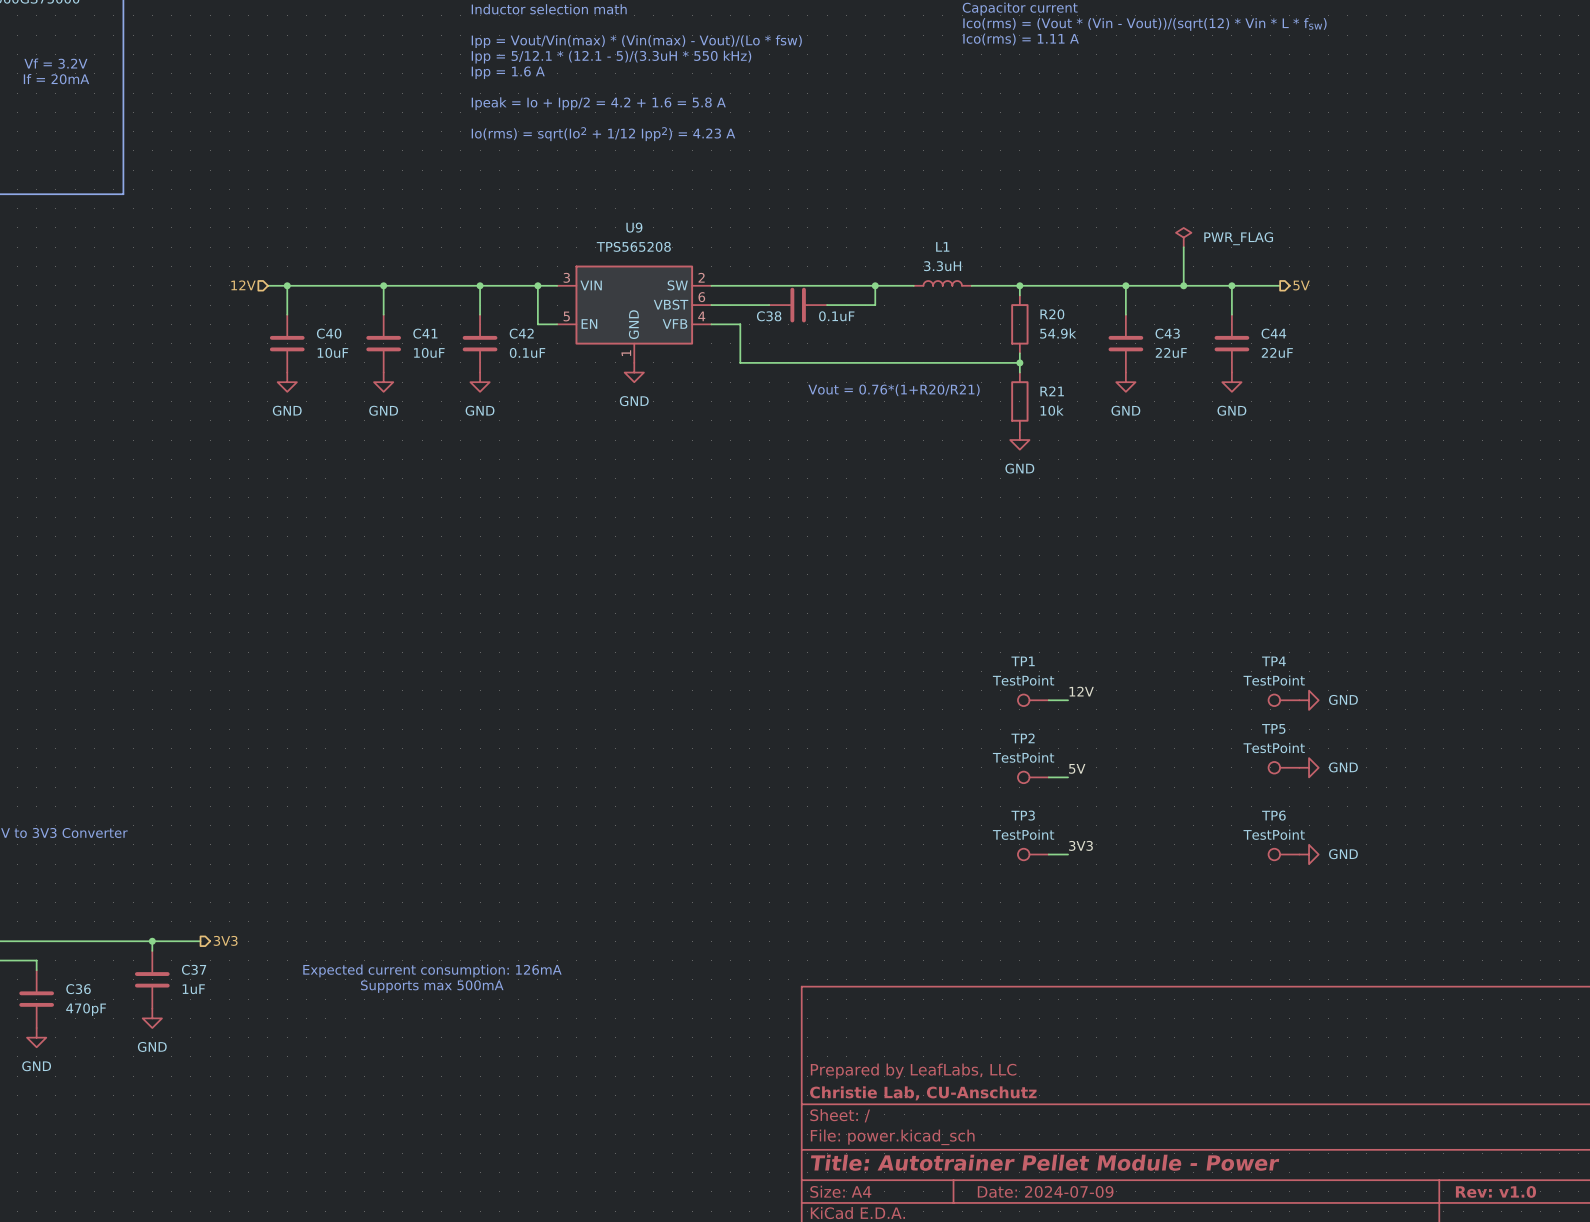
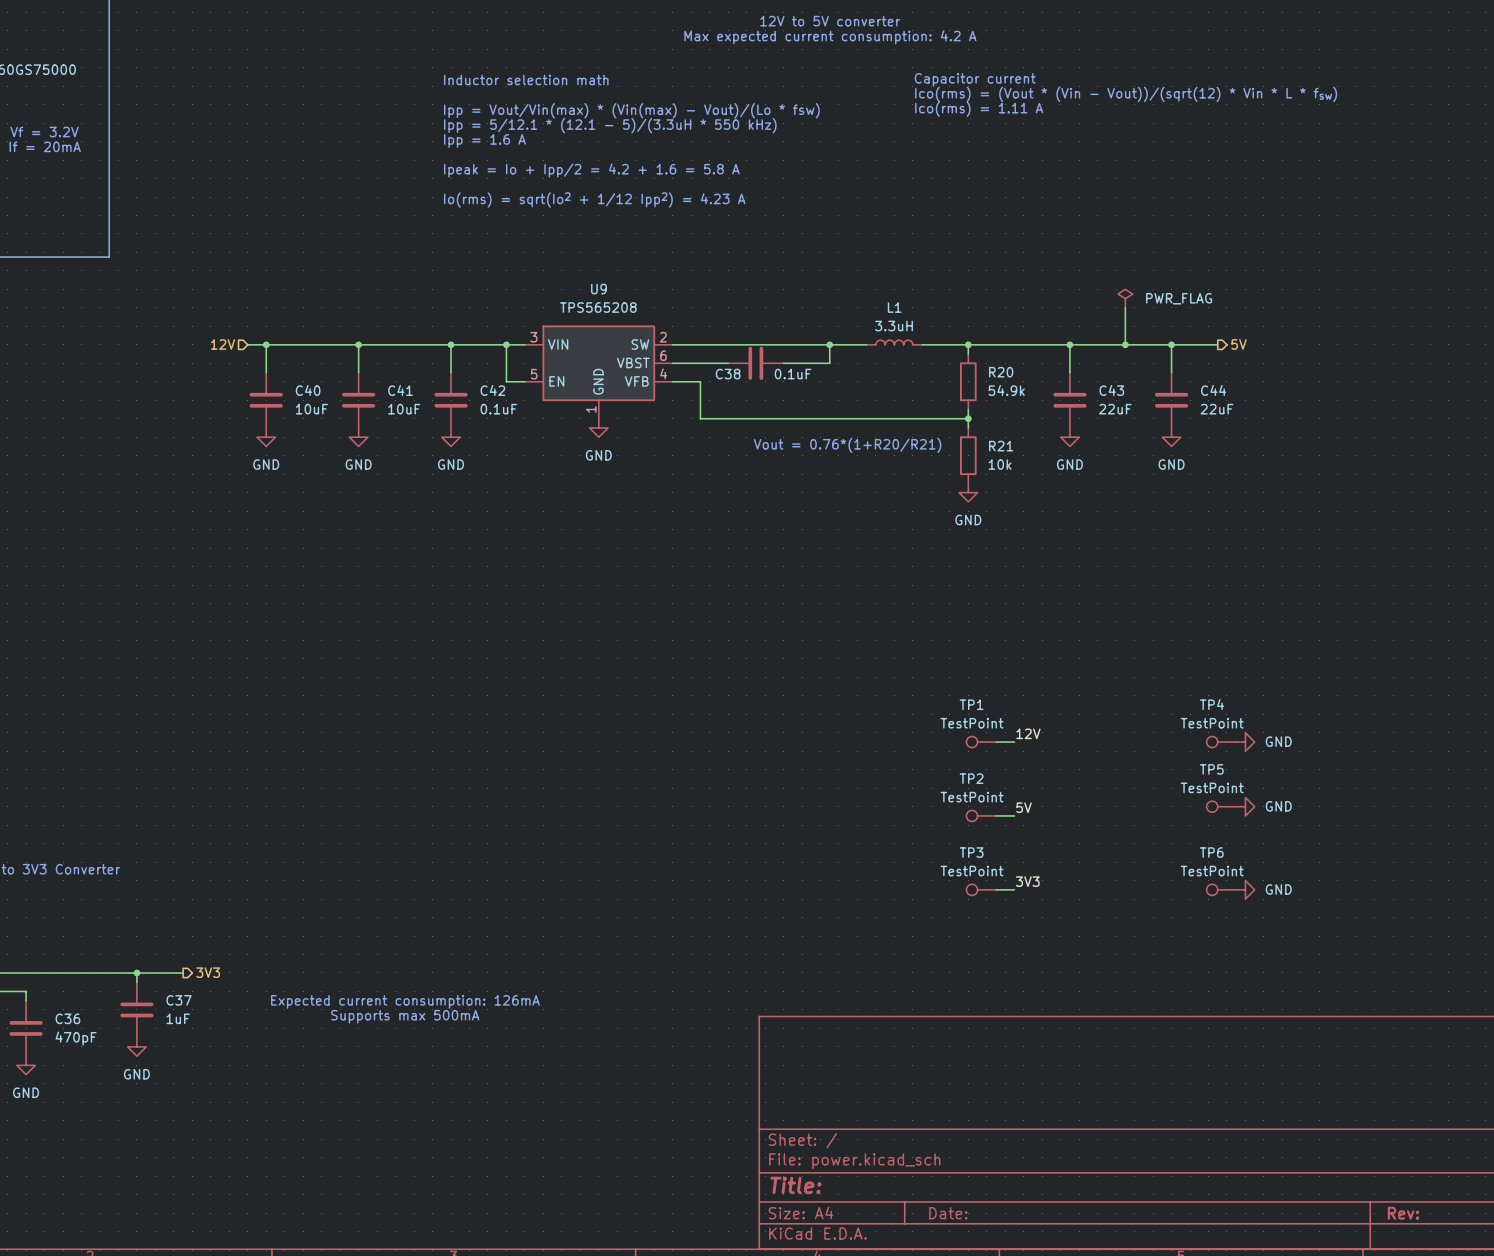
title block: Prepared by LeafLabs, LLC (913, 1071) -> none
title block: Christie Lab, CU-Anschutz (923, 1093) -> none
title block: Title: Autotrainer Pellet Module - Power (1045, 1162) -> Title: (795, 1185)
title block: Date: 2024-07-09 (1045, 1191) -> Date: (948, 1213)
title block: Rev: v1.0 (1495, 1191) -> Rev: (1403, 1213)

